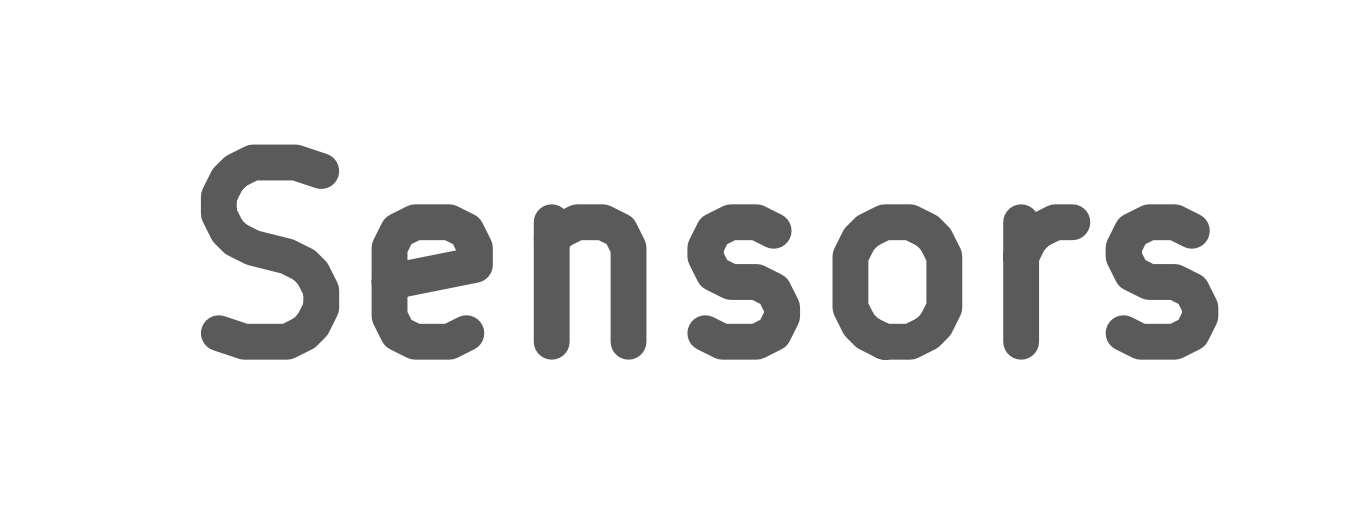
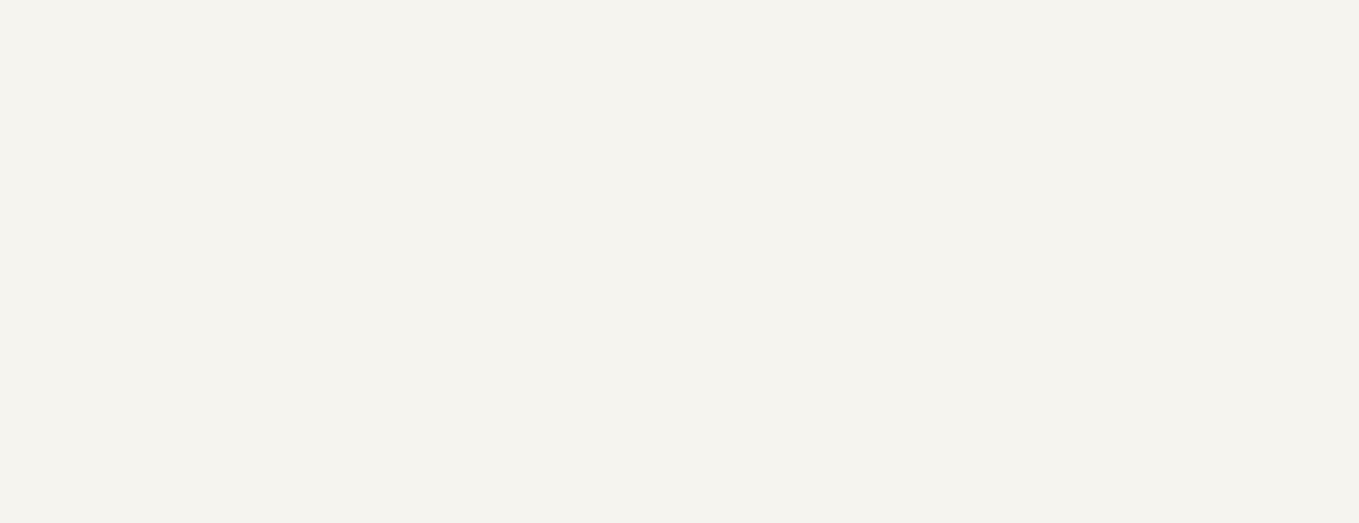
text: Sensors (709, 252) -> none

